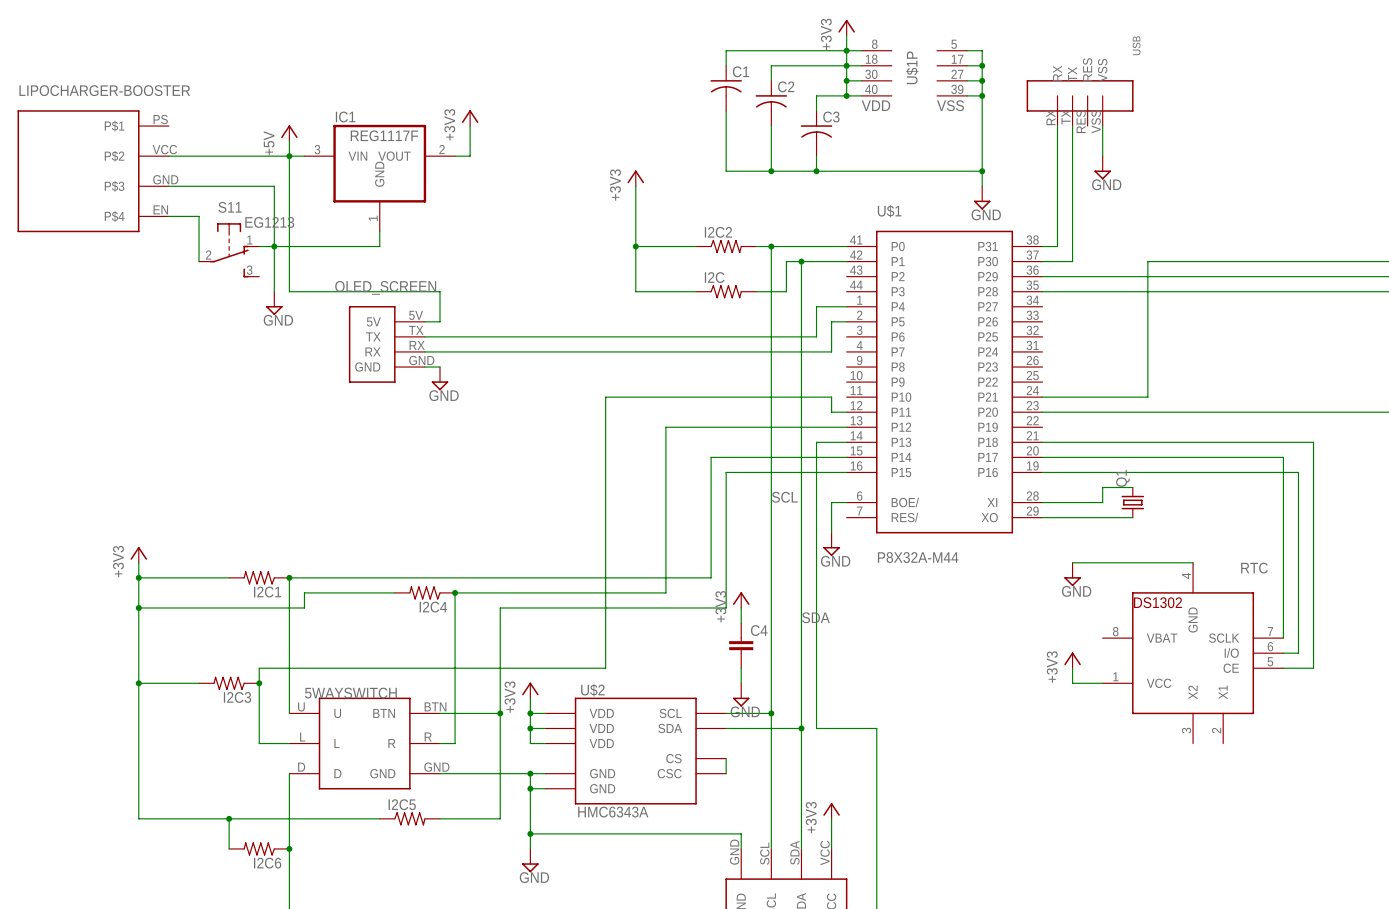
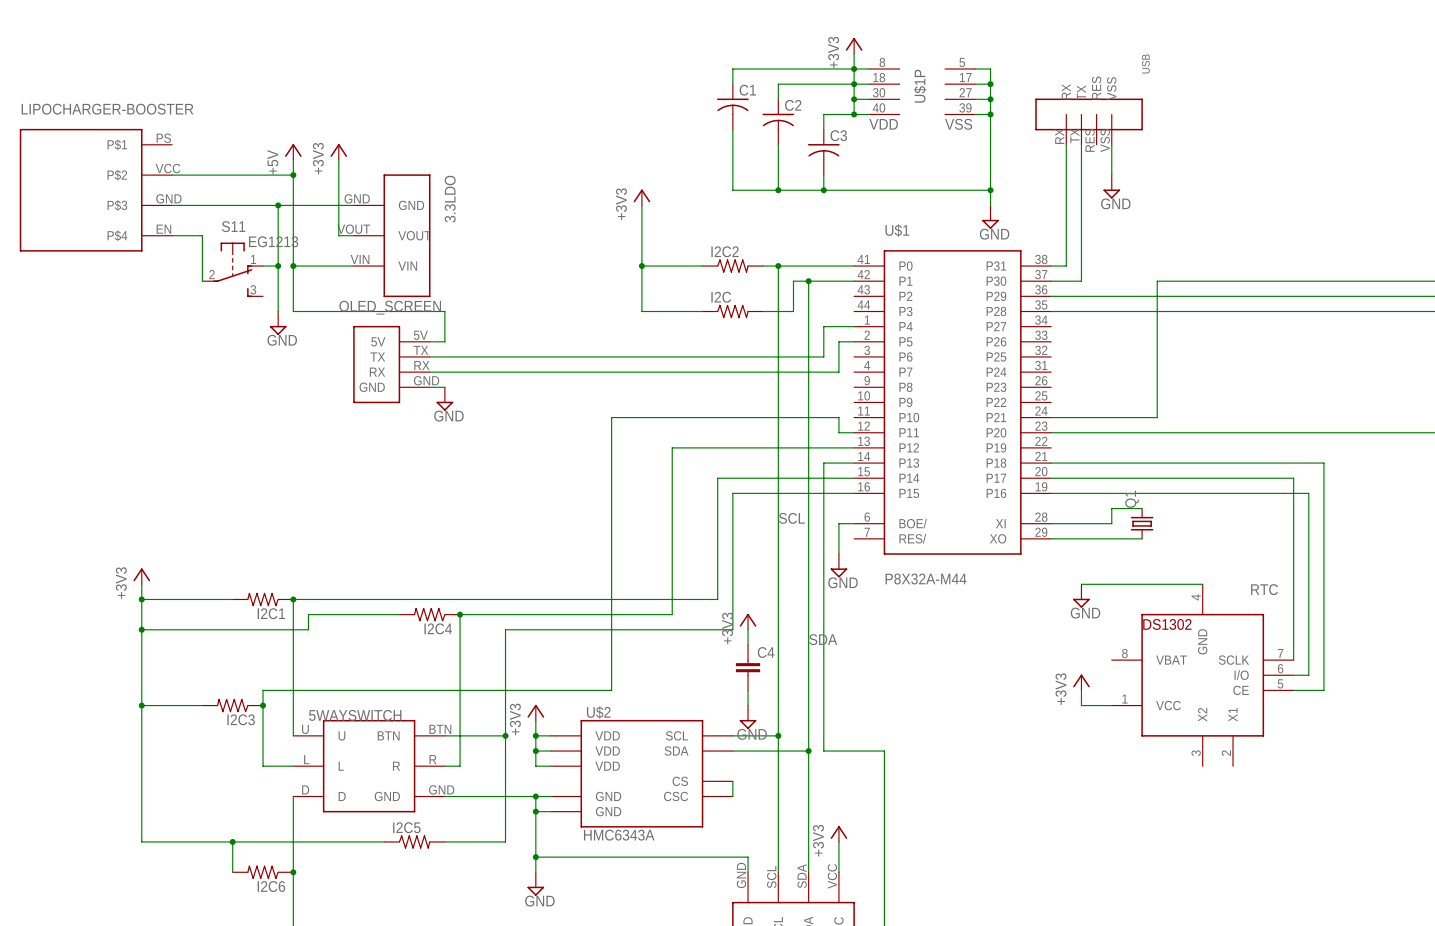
power symbol position: +3V3 (470, 118) -> +3V3 (338, 151)
wire: (470, 126) (470, 156) (455, 156) -> none
wire: (289, 156) (304, 156) -> none
IC1: REG1117F (379, 178) -> none
wire: none -> (278, 205) (353, 205)
junction: none -> (278, 205)
3.3LDO: none -> (392, 235)
wire: (274, 246) (289, 246) -> none
junction: none -> (293, 266)

